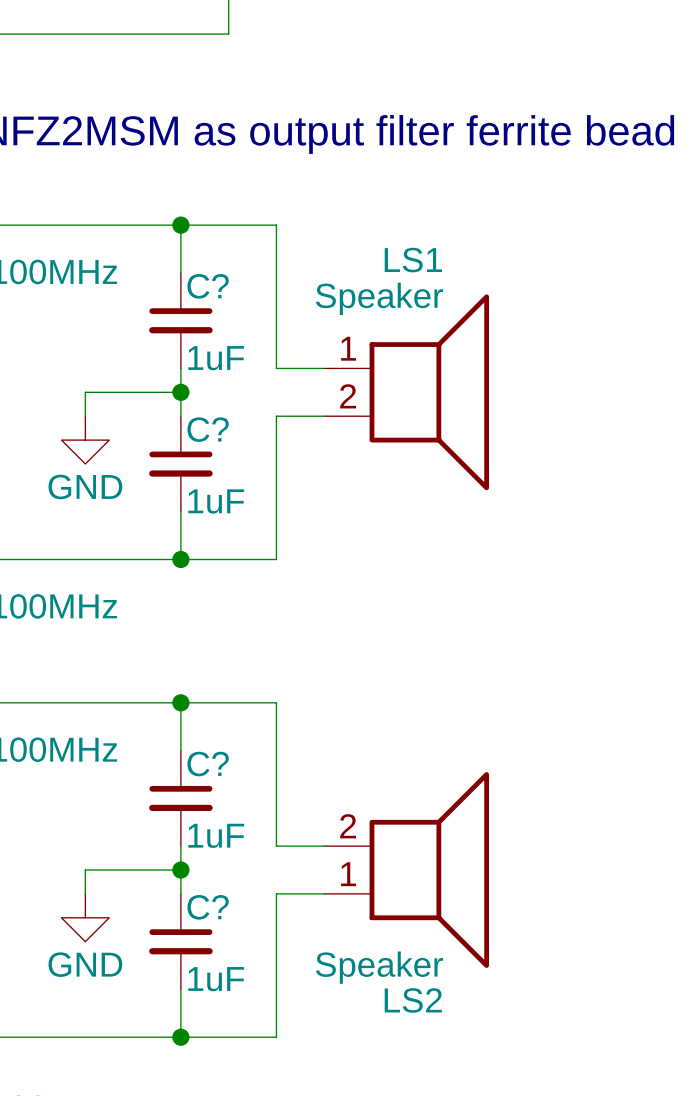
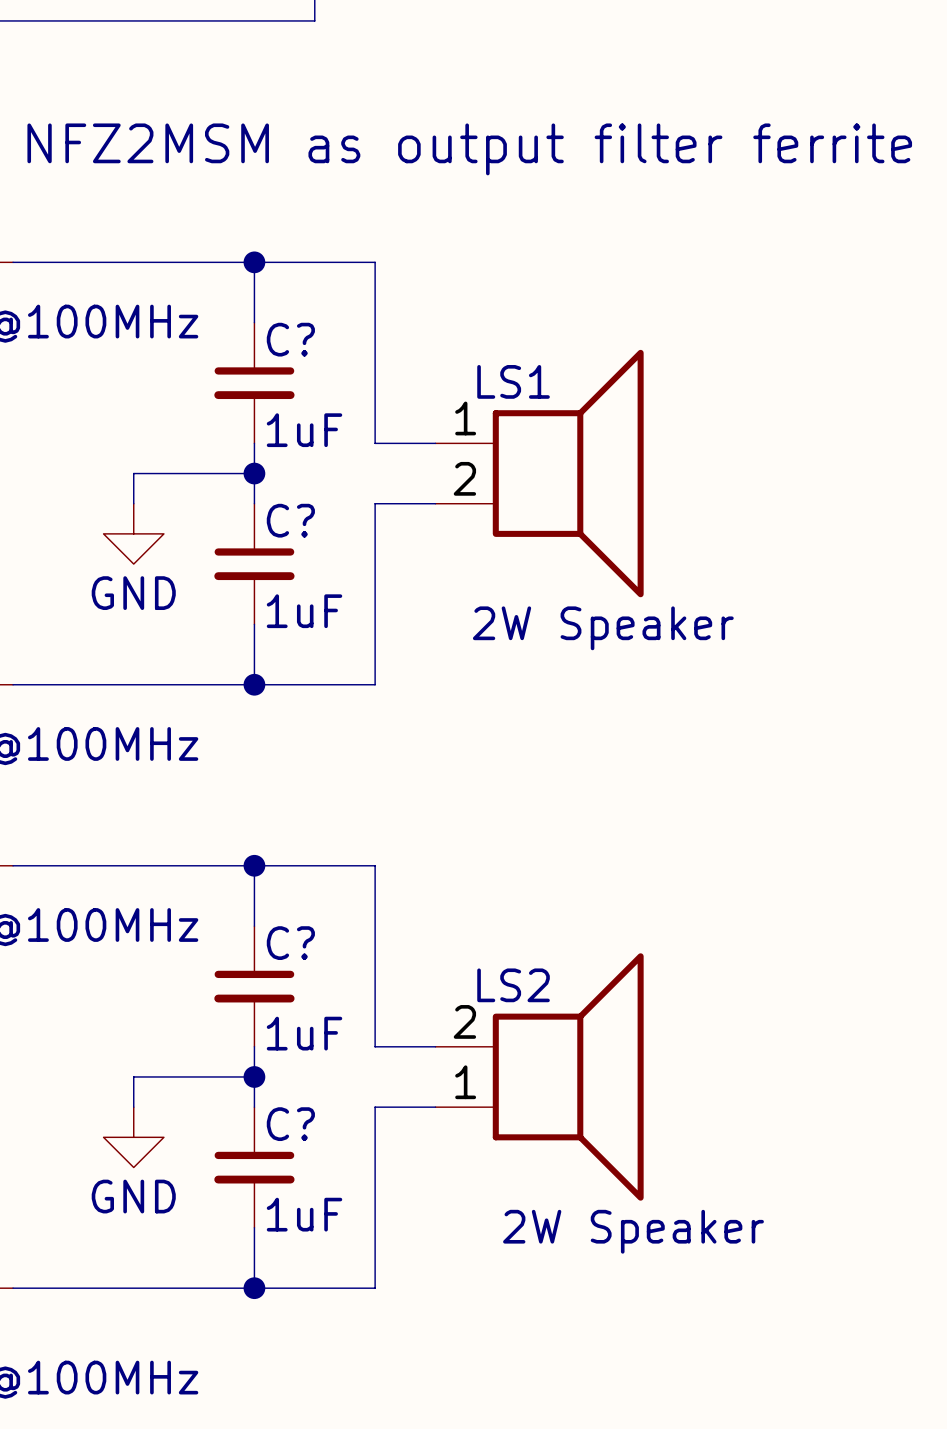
LS1 name position: LS1 (413, 260) -> LS1 (513, 381)
LS1 value: Speaker (379, 298) -> 2W Speaker (603, 628)
LS2 value: Speaker (379, 967) -> 2W Speaker (633, 1231)
LS2 name position: LS2 (413, 1000) -> LS2 (513, 985)

